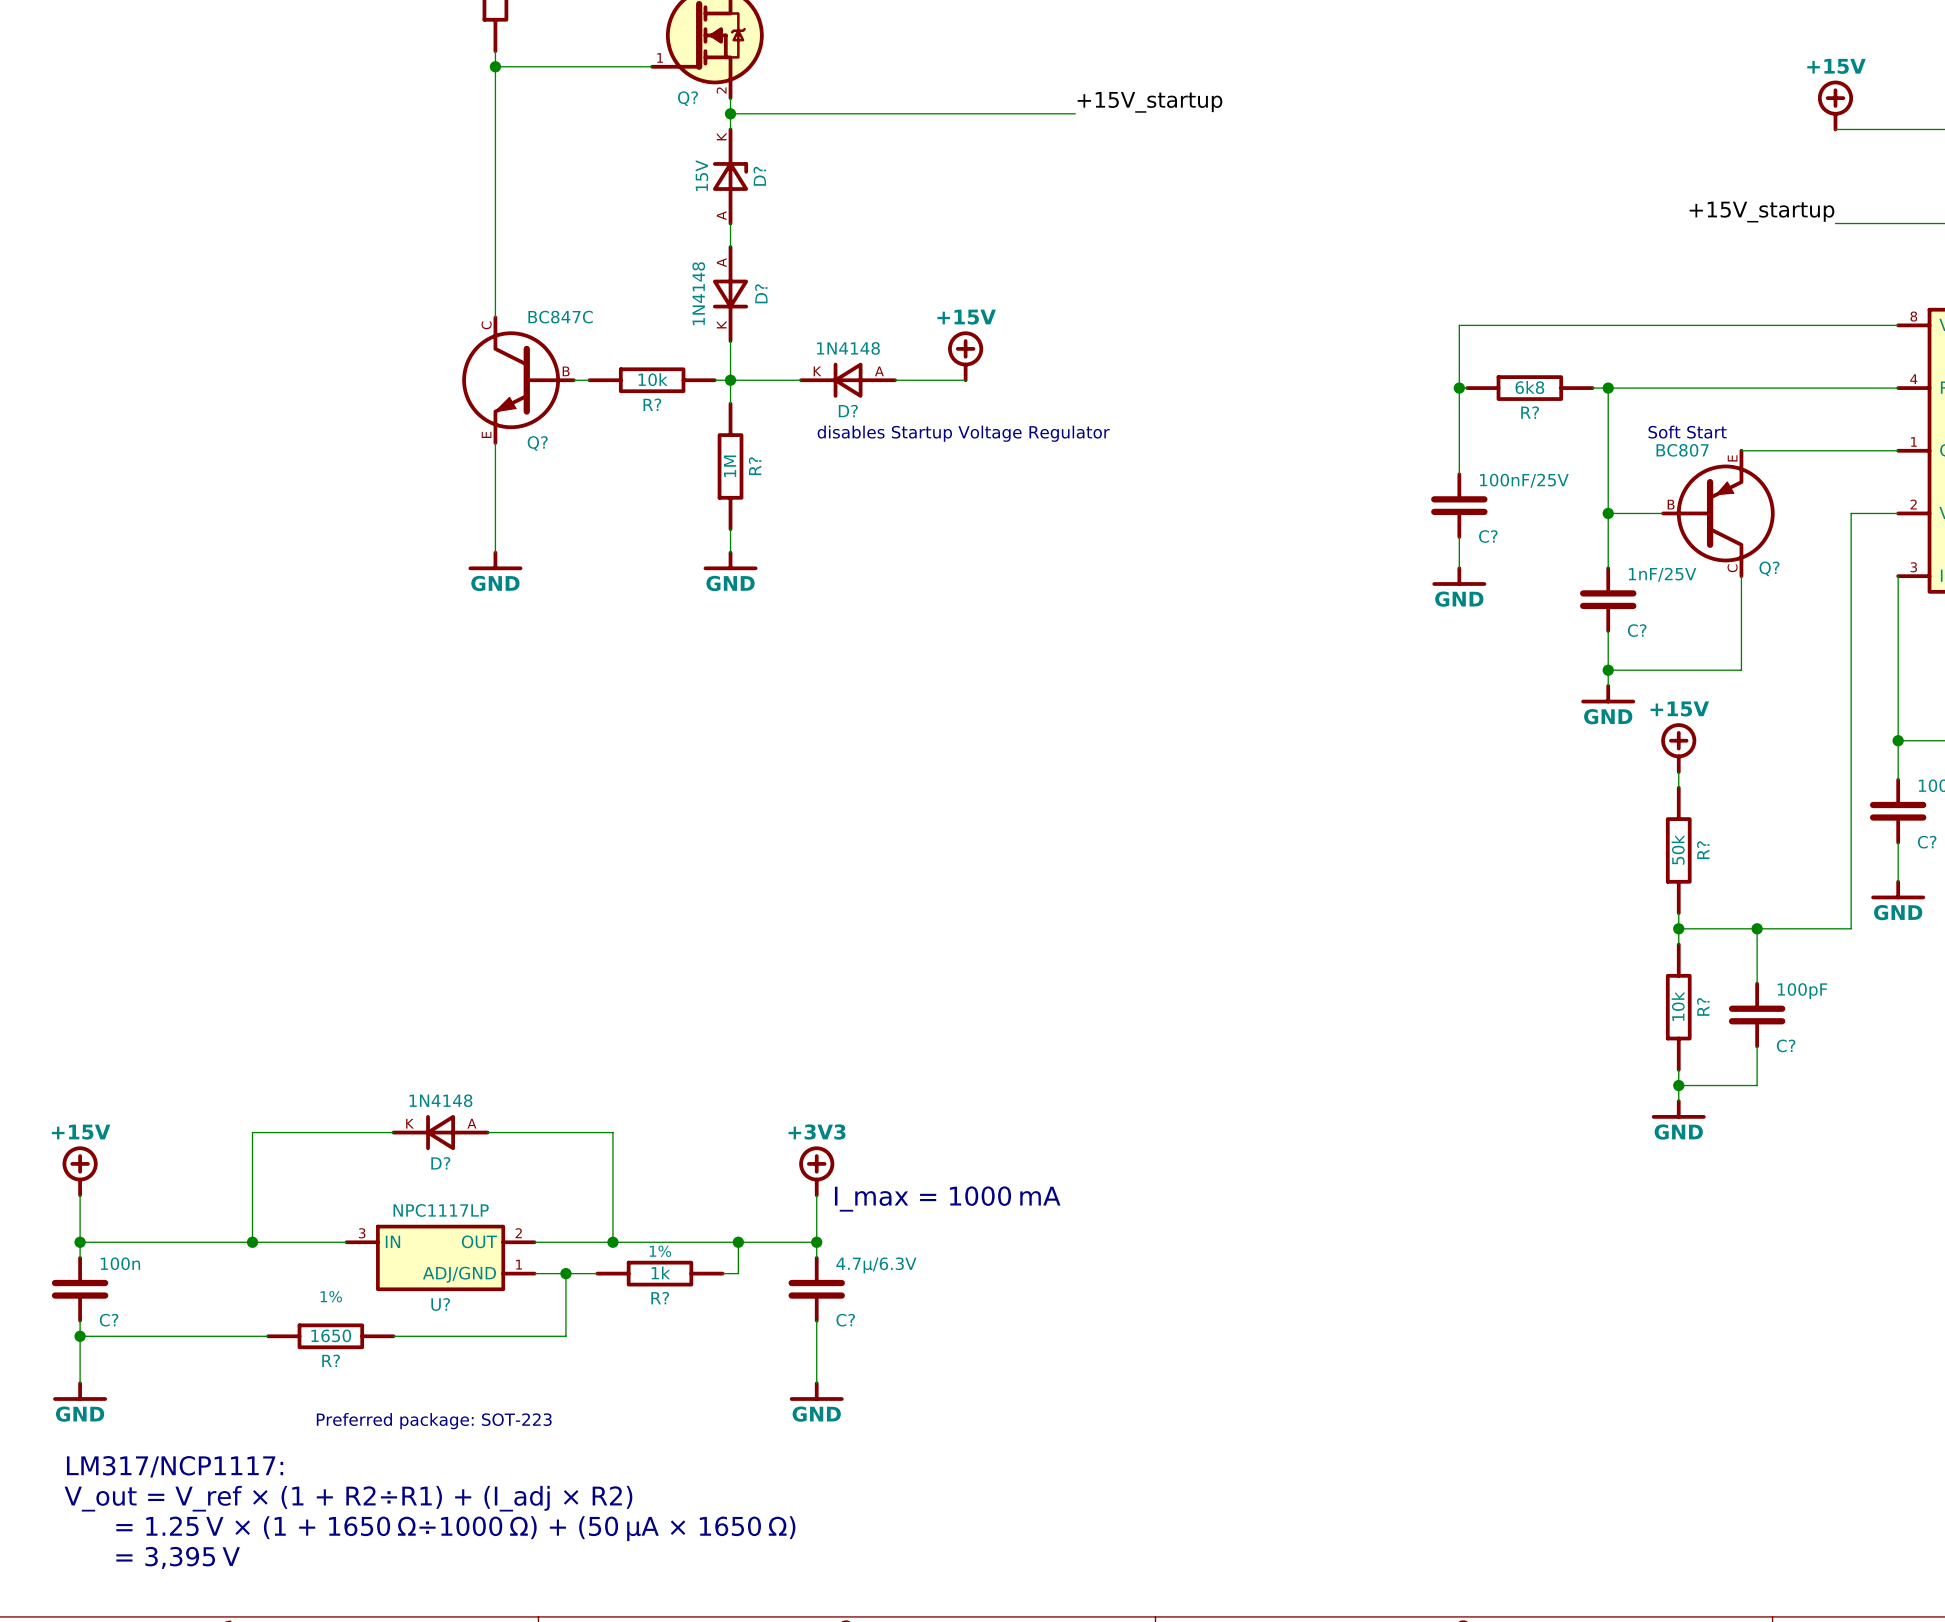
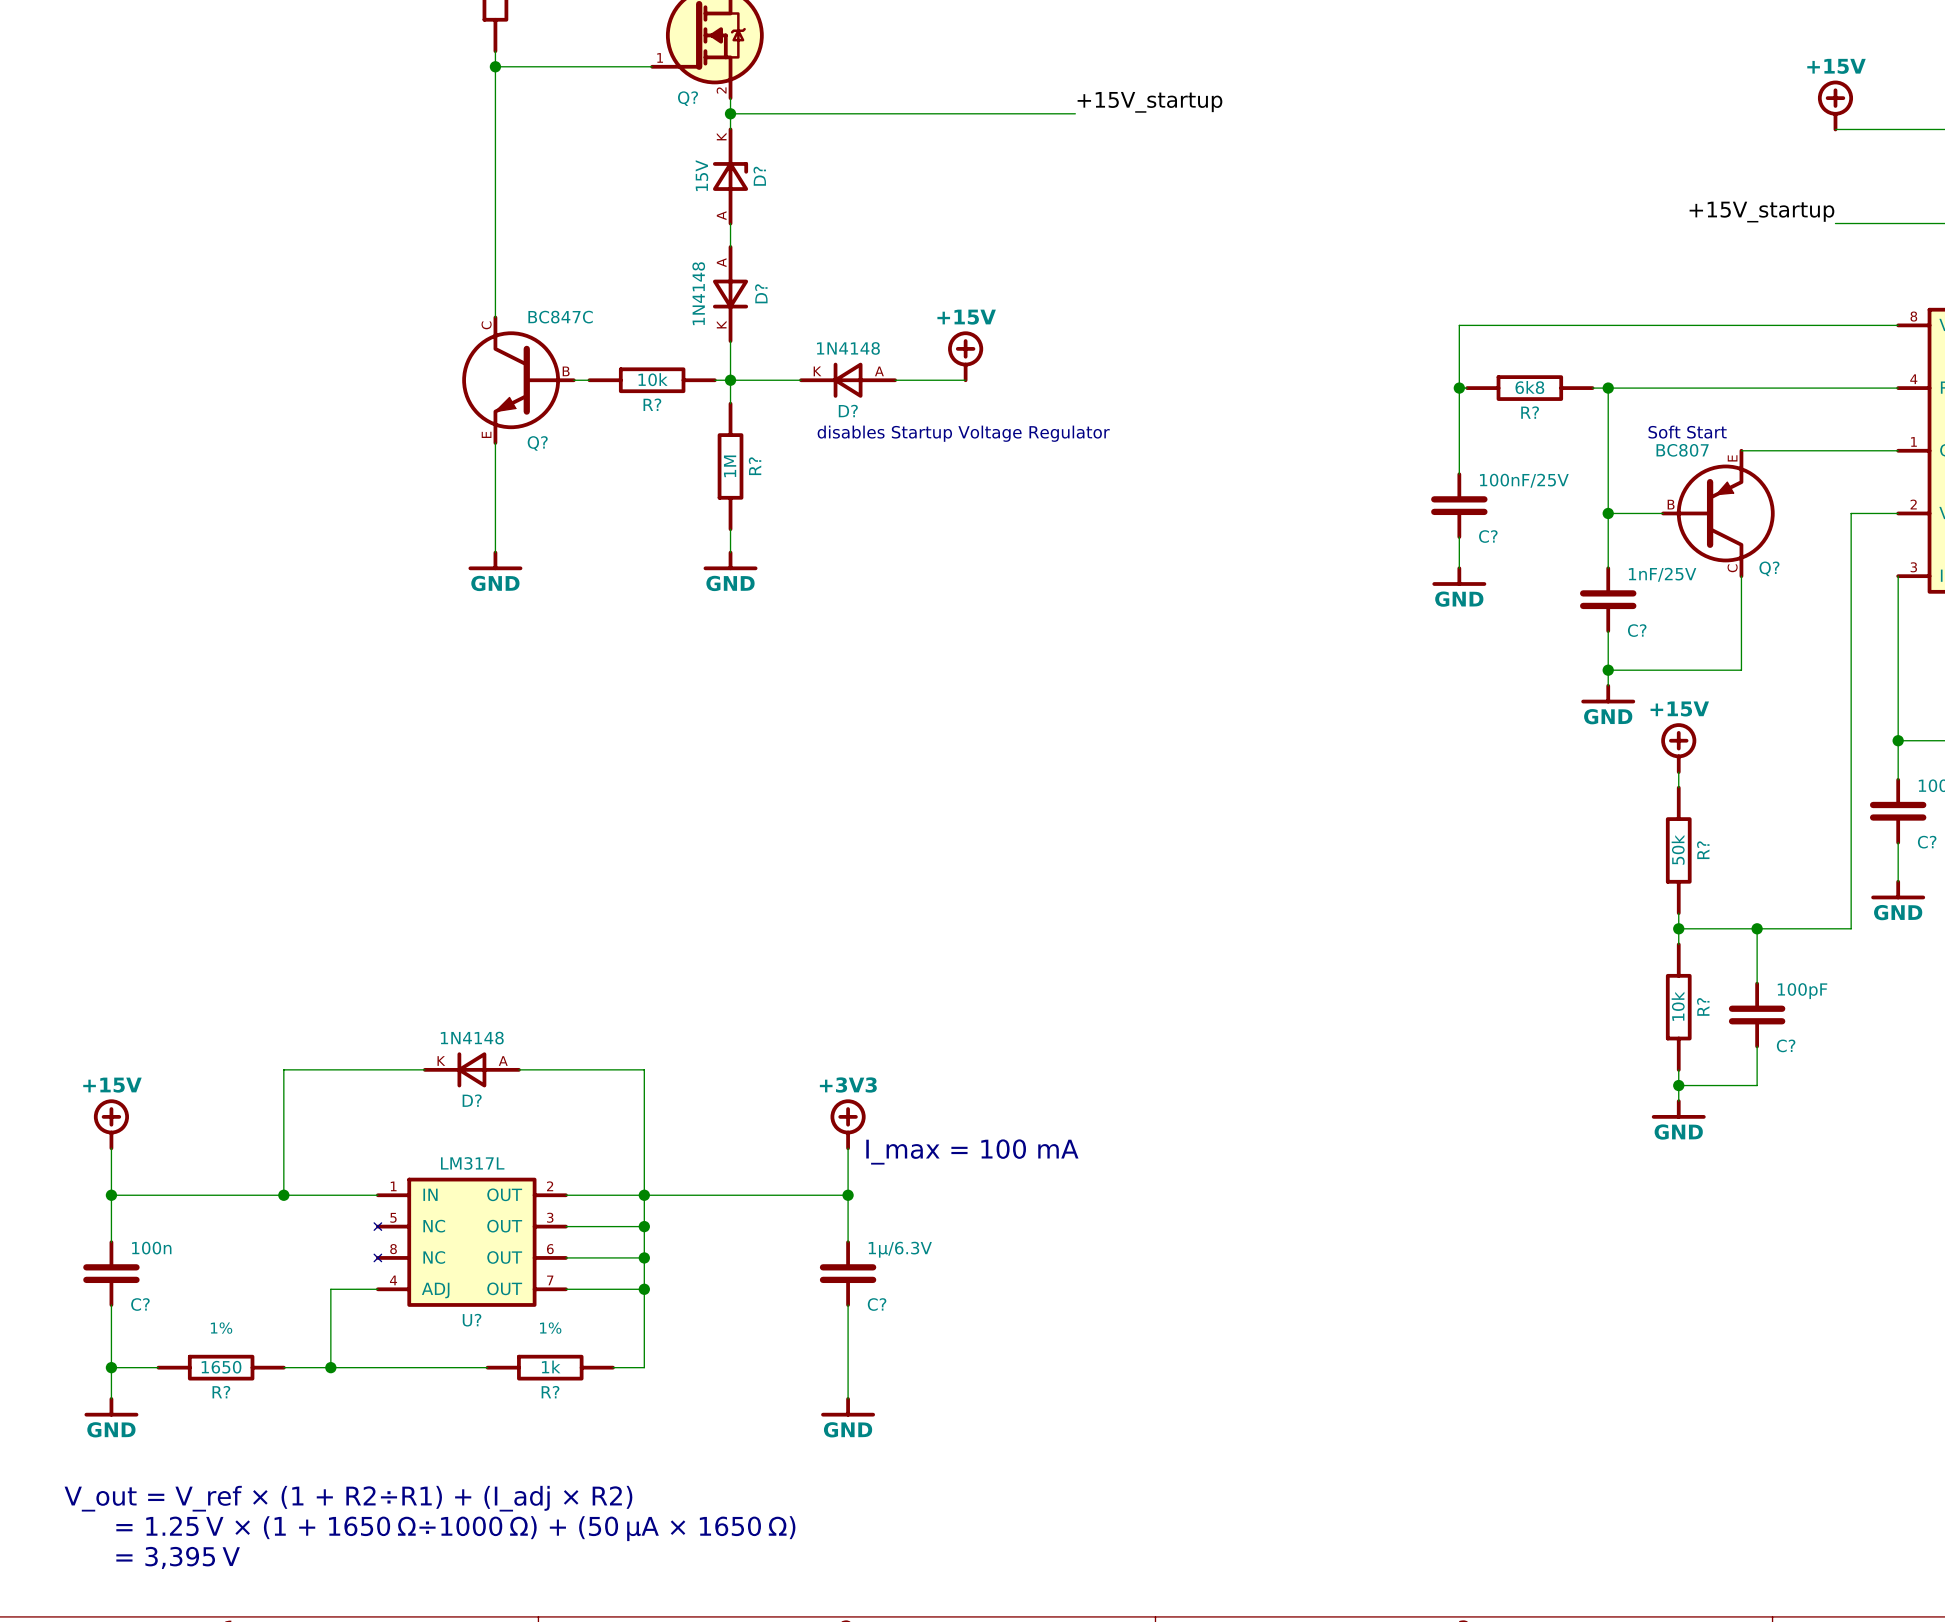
wire: none -> (424, 1069) (283, 1069) (283, 1195)
wire: none -> (518, 1069) (644, 1069) (644, 1367) (612, 1367)
wire: (393, 1132) (252, 1132) (252, 1242) -> none
D? position: (440, 1132) -> (471, 1069)
wire: (487, 1132) (612, 1132) (612, 1242) -> none
wire: none -> (111, 1148) (111, 1242)
wire: none -> (848, 1148) (848, 1242)
text: none -> I_max = 100 mA (972, 1151)
power symbol position: +15V (80, 1171) -> +15V (111, 1124)
power symbol position: +3V3 (816, 1171) -> +3V3 (848, 1124)
wire: (80, 1195) (80, 1257) -> none
junction: none -> (644, 1195)
wire: (816, 1195) (816, 1257) -> none
text: I_max = 1000 mA (947, 1199) -> none
wire: none -> (565, 1226) (644, 1226)
junction: none -> (644, 1226)
wire: (80, 1242) (346, 1242) -> (111, 1195) (377, 1195)
junction position: (80, 1242) -> (111, 1195)
junction position: (252, 1242) -> (283, 1195)
U?: none -> LM317L (471, 1242)
wire: (534, 1242) (816, 1242) -> (565, 1195) (848, 1195)
junction: (612, 1242) -> none
wire: (738, 1242) (738, 1273) (722, 1273) -> none
junction: (738, 1242) -> none
junction position: (816, 1242) -> (848, 1195)
R? text position: 1% (660, 1251) -> 1% (550, 1328)
U?: NPC1117LP (440, 1257) -> none
wire: none -> (565, 1257) (644, 1257)
junction: none -> (644, 1257)
wire: (534, 1273) (597, 1273) -> none
wire: (565, 1273) (565, 1336) (393, 1336) -> none
junction: (565, 1273) -> none
R? position: (659, 1273) -> (550, 1367)
C?: none -> 1µ/6.3V (848, 1273)
C? position: (80, 1289) -> (111, 1273)
wire: none -> (377, 1289) (330, 1289) (330, 1367)
wire: none -> (565, 1289) (644, 1289)
junction: none -> (644, 1289)
C?: 4.7µ/6.3V (816, 1289) -> none
wire: none -> (111, 1304) (111, 1399)
wire: none -> (848, 1304) (848, 1399)
wire: (80, 1320) (80, 1383) -> none
wire: (816, 1320) (816, 1383) -> none
wire: (80, 1336) (268, 1336) -> none
junction position: (80, 1336) -> (111, 1367)
R? position: (330, 1336) -> (221, 1367)
wire: none -> (111, 1367) (158, 1367)
wire: none -> (283, 1367) (487, 1367)
junction: none -> (330, 1367)
power symbol position: GND (80, 1391) -> GND (111, 1406)
power symbol position: GND (816, 1391) -> GND (848, 1406)
text: Preferred package: SOT-223 (434, 1421) -> none
text: LM317/NCP1117: (175, 1466) -> none

